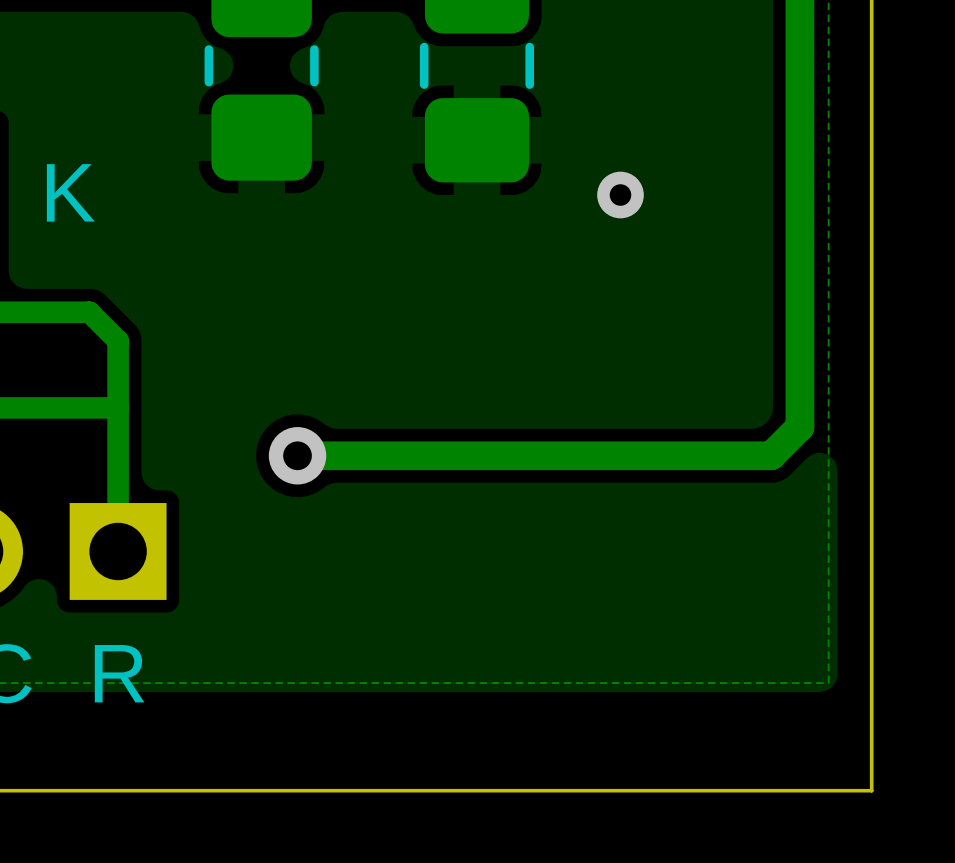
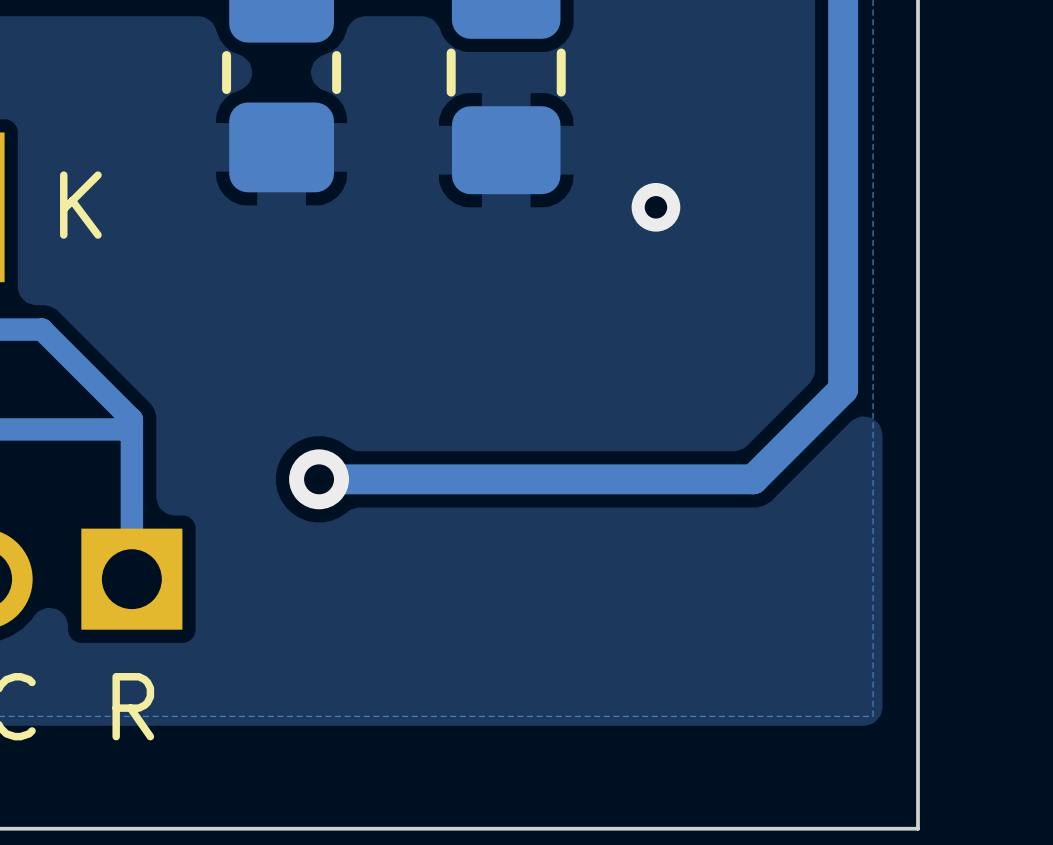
track: (31, 312) (89, 312) (118, 340) (118, 398) -> (42, 329) (131, 419)
track: (799, 369) (799, 427) (771, 455) (713, 455) -> (843, 389) (753, 479)

